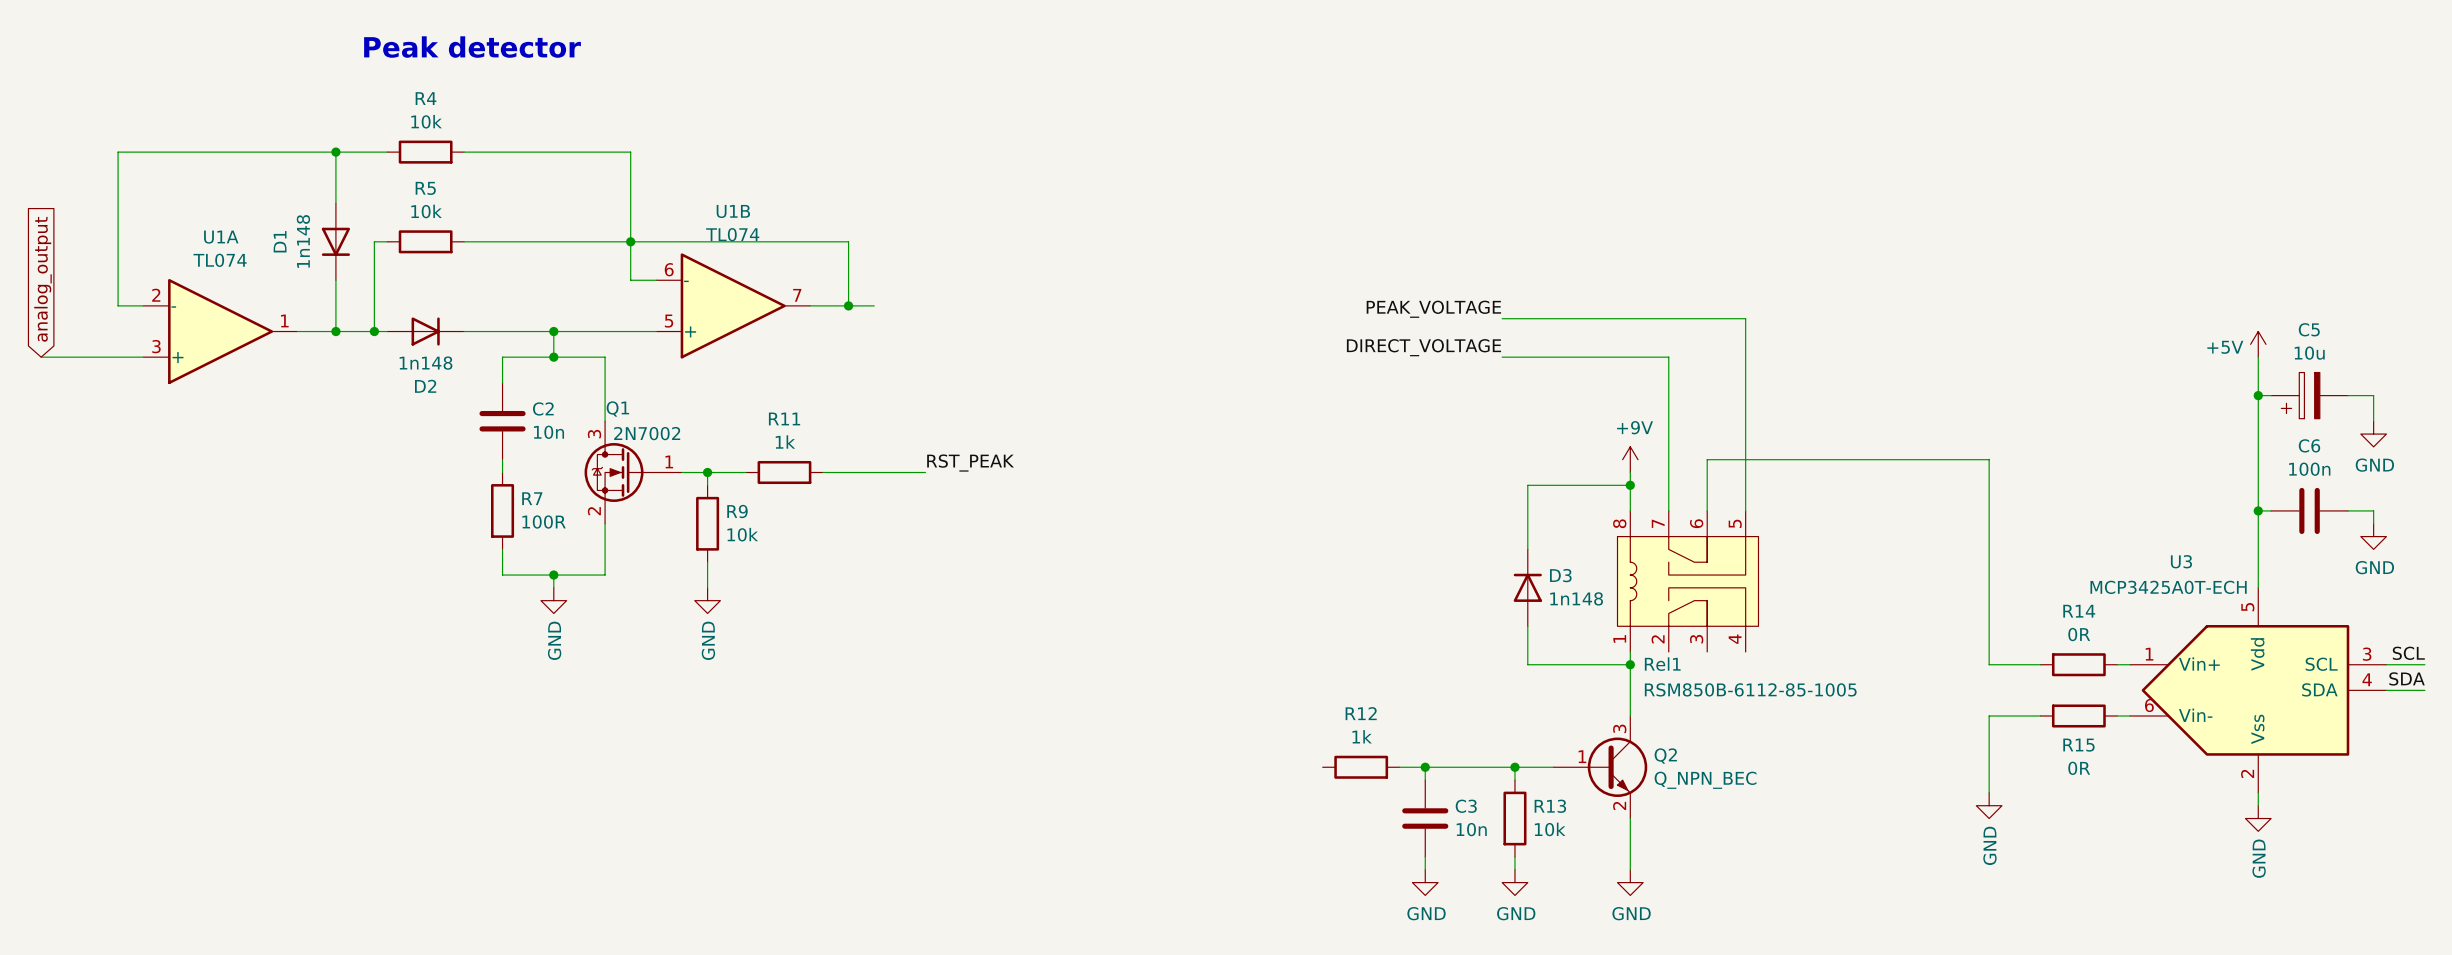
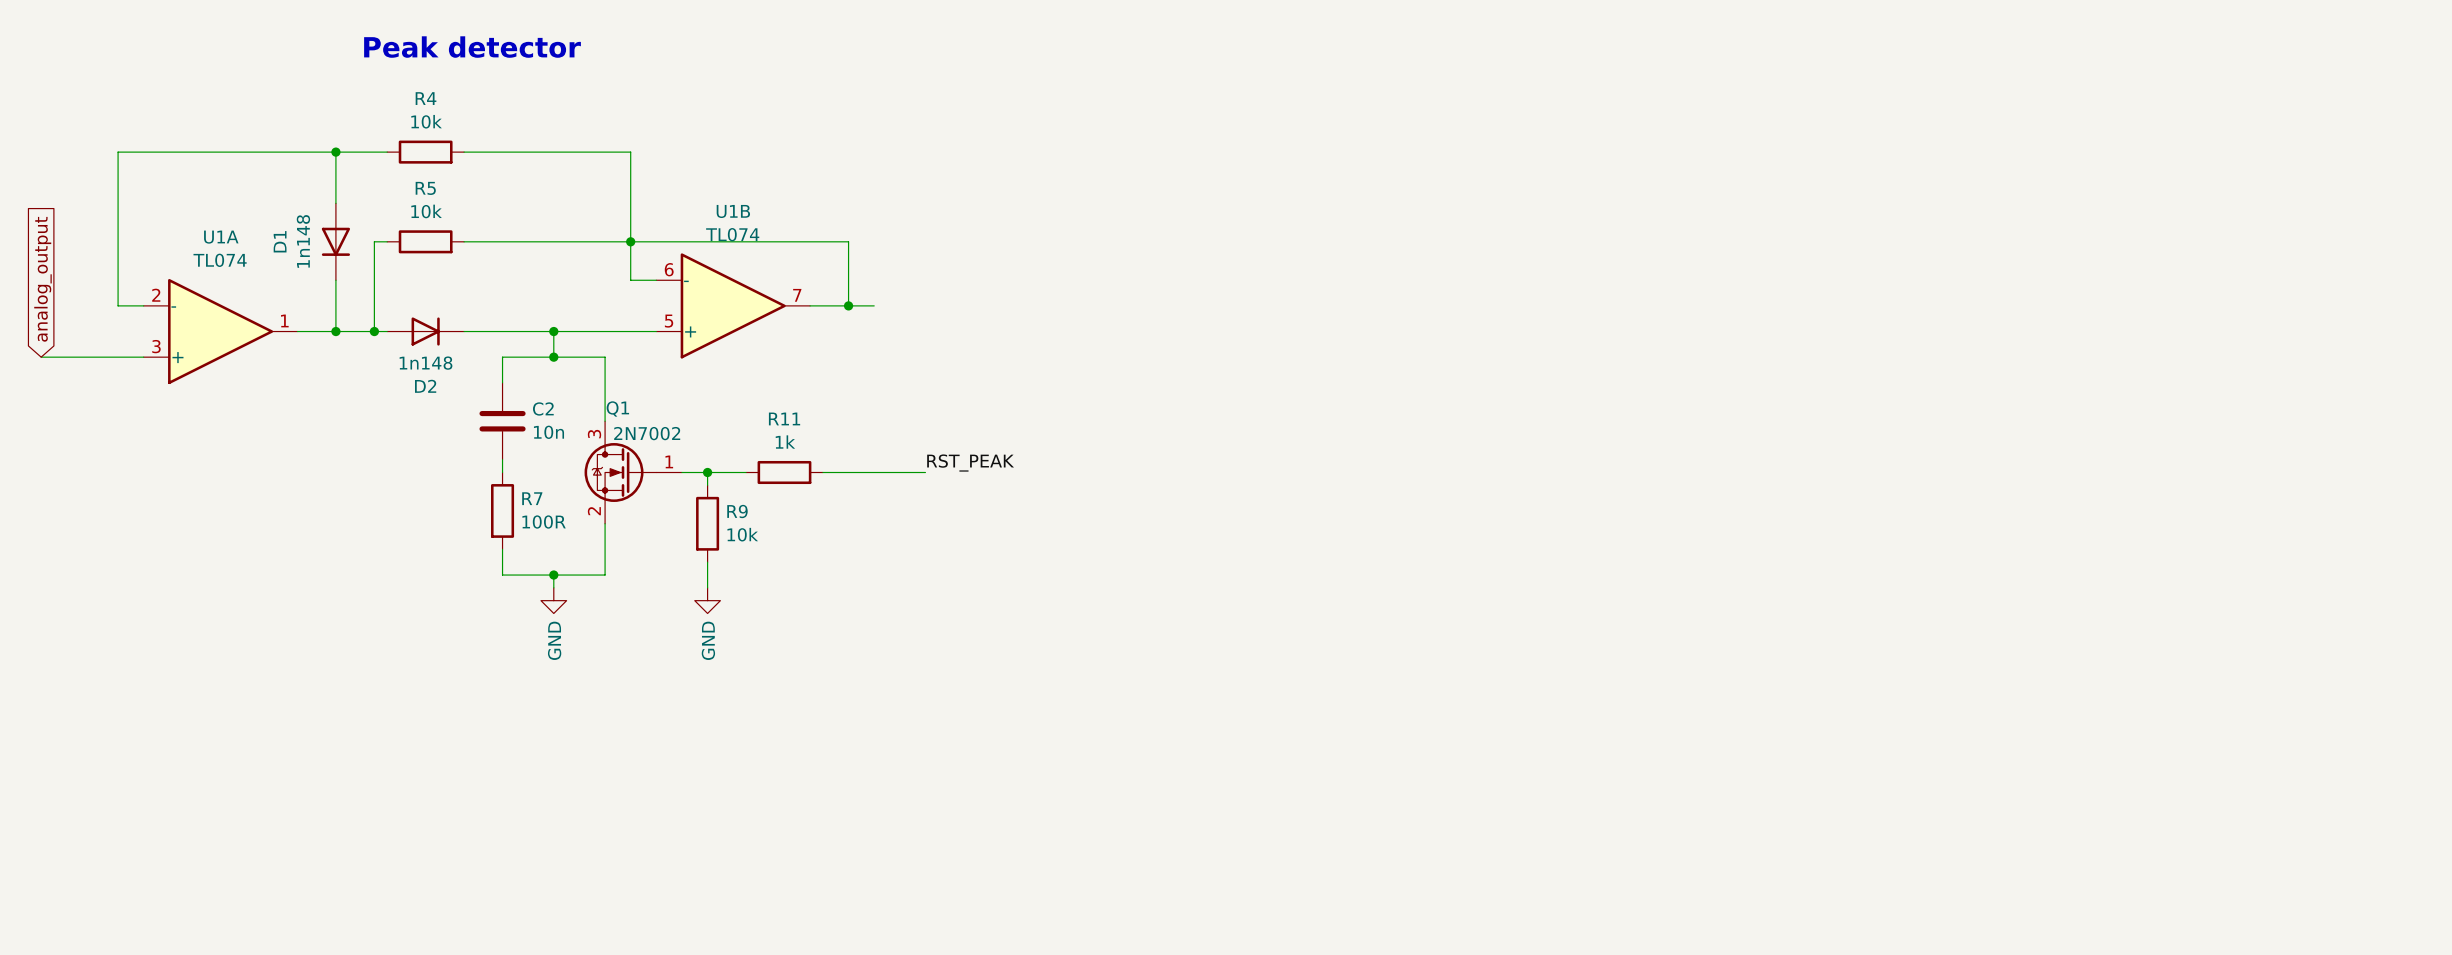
label: PEAK_VOLTAGE (1433, 309) -> none
wire: (1502, 318) (1745, 318) (1745, 510) -> none
power symbol: +5V (2258, 344) -> none
label: DIRECT_VOLTAGE (1423, 347) -> none
wire: (1502, 357) (1668, 357) (1668, 510) -> none
wire: (2258, 357) (2258, 587) -> none
wire: (2258, 395) (2271, 395) -> none
junction: (2258, 395) -> none
C5: 10u (2309, 395) -> none
wire: (2347, 395) (2373, 395) (2373, 421) -> none
power symbol: GND (2373, 434) -> none
power symbol: +9V (1630, 459) -> none
wire: (1630, 472) (1630, 510) -> none
wire: (1630, 485) (1527, 485) (1527, 549) -> none
junction: (1630, 485) -> none
wire: (1707, 510) (1707, 459) (1989, 459) (1989, 664) (2040, 664) -> none
wire: (2258, 510) (2271, 510) -> none
junction: (2258, 510) -> none
C6: 100n (2309, 510) -> none
wire: (2347, 510) (2373, 510) (2373, 523) -> none
power symbol: GND (2373, 536) -> none
Rel1: RSM850B-6112-85-1005 (1687, 581) -> none
D3: 1n148 (1527, 587) -> none
wire: (1527, 626) (1527, 664) (1630, 664) -> none
wire: (1630, 651) (1630, 716) -> none
label: SCL (2408, 653) -> none
junction: (1630, 664) -> none
R14: 0R (2078, 664) -> none
wire: (2117, 664) (2130, 664) -> none
wire: (2386, 664) (2424, 664) -> none
label: SDA (2407, 678) -> none
U3: MCP3425A0T-ECH (2258, 690) -> none
wire: (2386, 690) (2424, 690) -> none
wire: (2040, 716) (1989, 716) (1989, 792) -> none
R15: 0R (2078, 716) -> none
wire: (2117, 716) (2130, 716) -> none
R12: 1k (1361, 767) -> none
wire: (1399, 767) (1553, 767) -> none
wire: (1425, 767) (1425, 780) -> none
junction: (1425, 767) -> none
wire: (1514, 767) (1514, 780) -> none
junction: (1514, 767) -> none
Q2: Q_NPN_BEC (1600, 767) -> none
wire: (2258, 792) (2258, 805) -> none
power symbol: GND (1989, 805) -> none
C3: 10n (1425, 818) -> none
R13: 10k (1514, 818) -> none
wire: (1630, 818) (1630, 869) -> none
power symbol: GND (2258, 818) -> none
wire: (1425, 856) (1425, 869) -> none
wire: (1514, 856) (1514, 869) -> none
power symbol: GND (1425, 882) -> none
power symbol: GND (1514, 882) -> none
power symbol: GND (1630, 882) -> none

